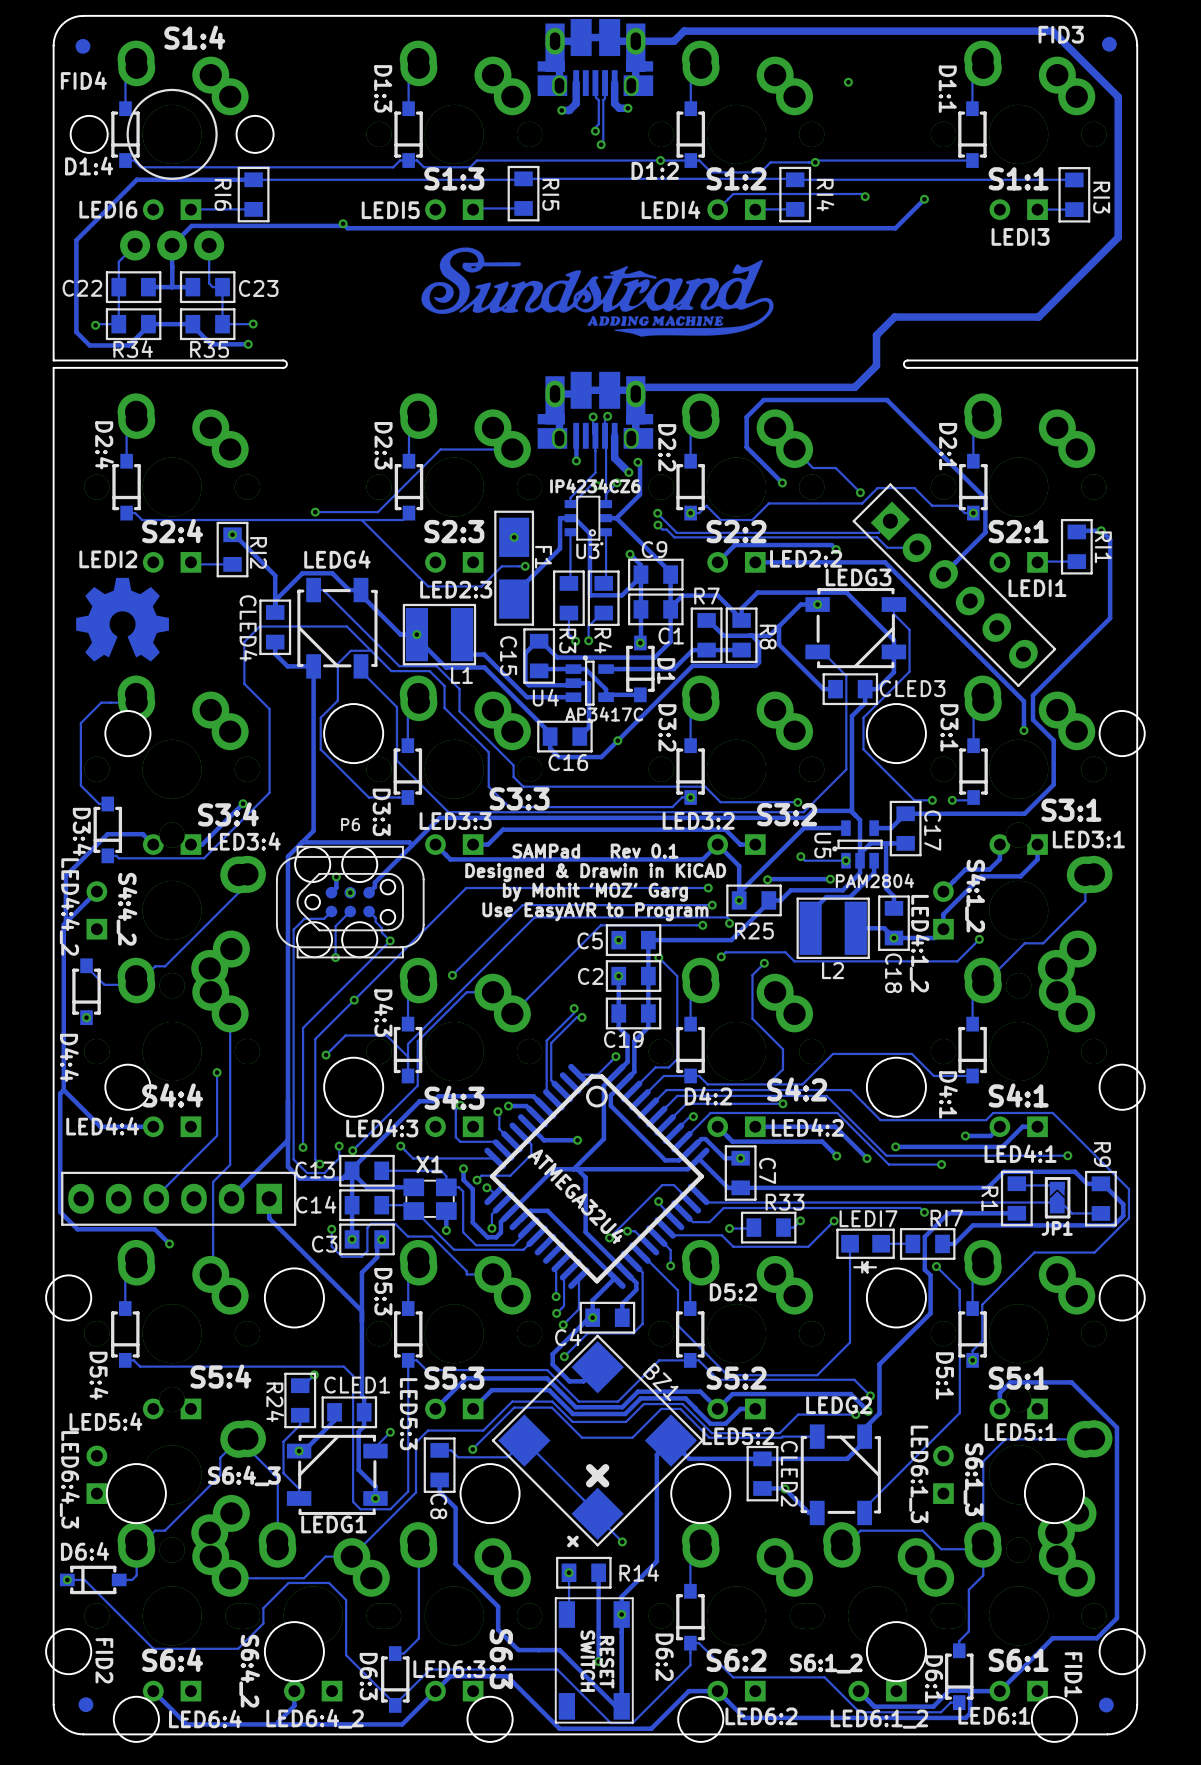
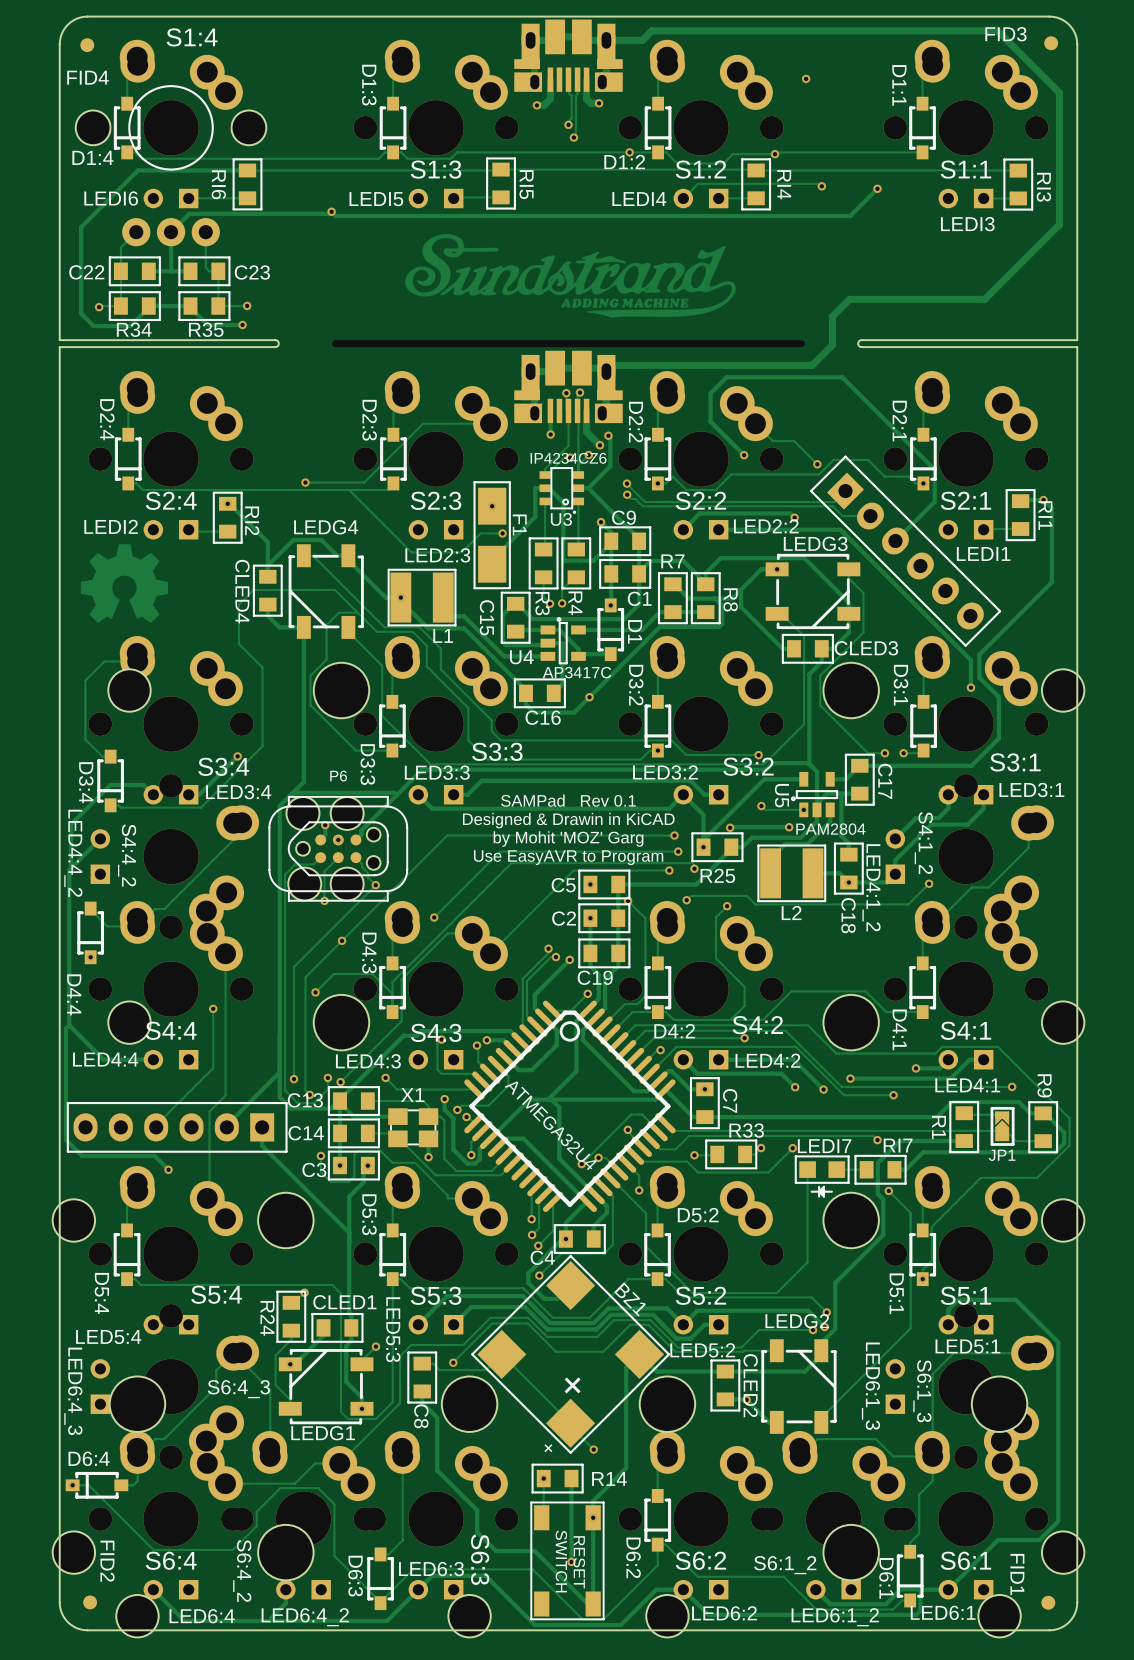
via: none -> (569, 959)
track: (528, 1124) (544, 1140) (577, 1140) -> (505, 1058) (518, 1070) (531, 1070) (556, 1045) (556, 1030) (534, 1008) (534, 994) (569, 959)
via: (577, 1140) -> none

